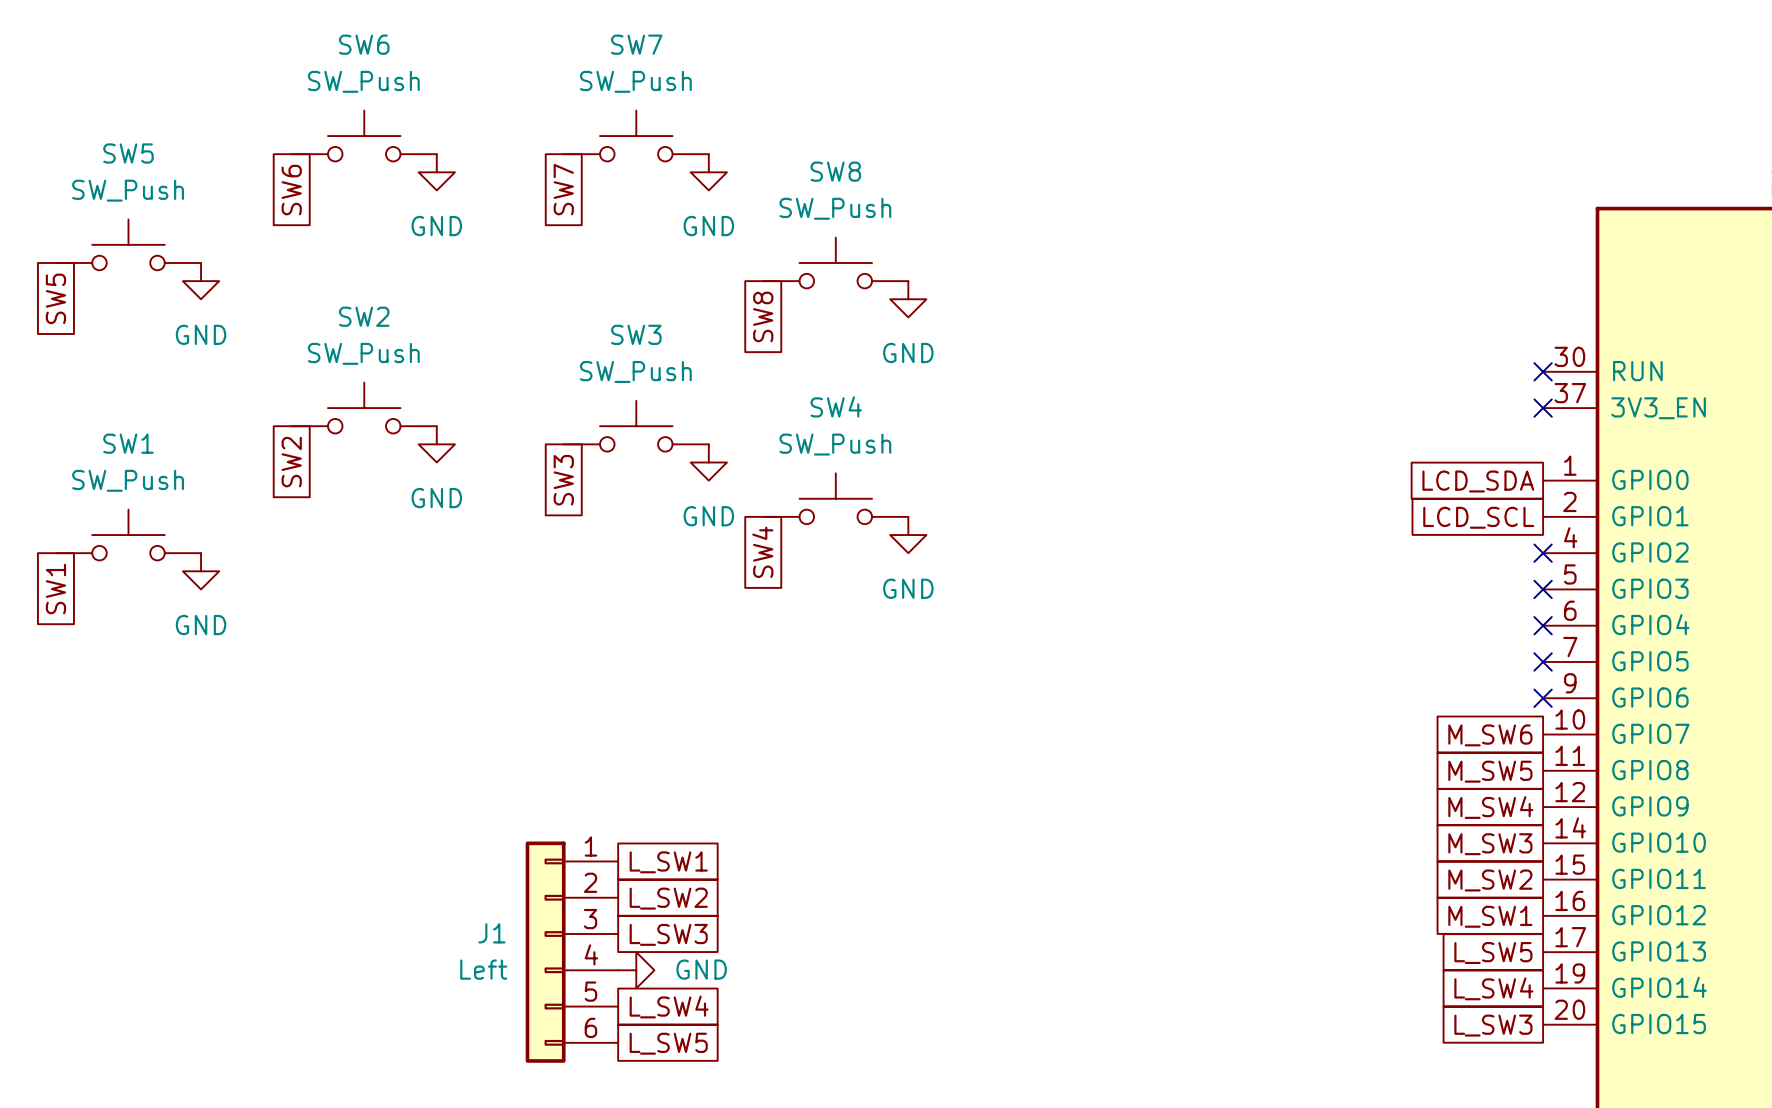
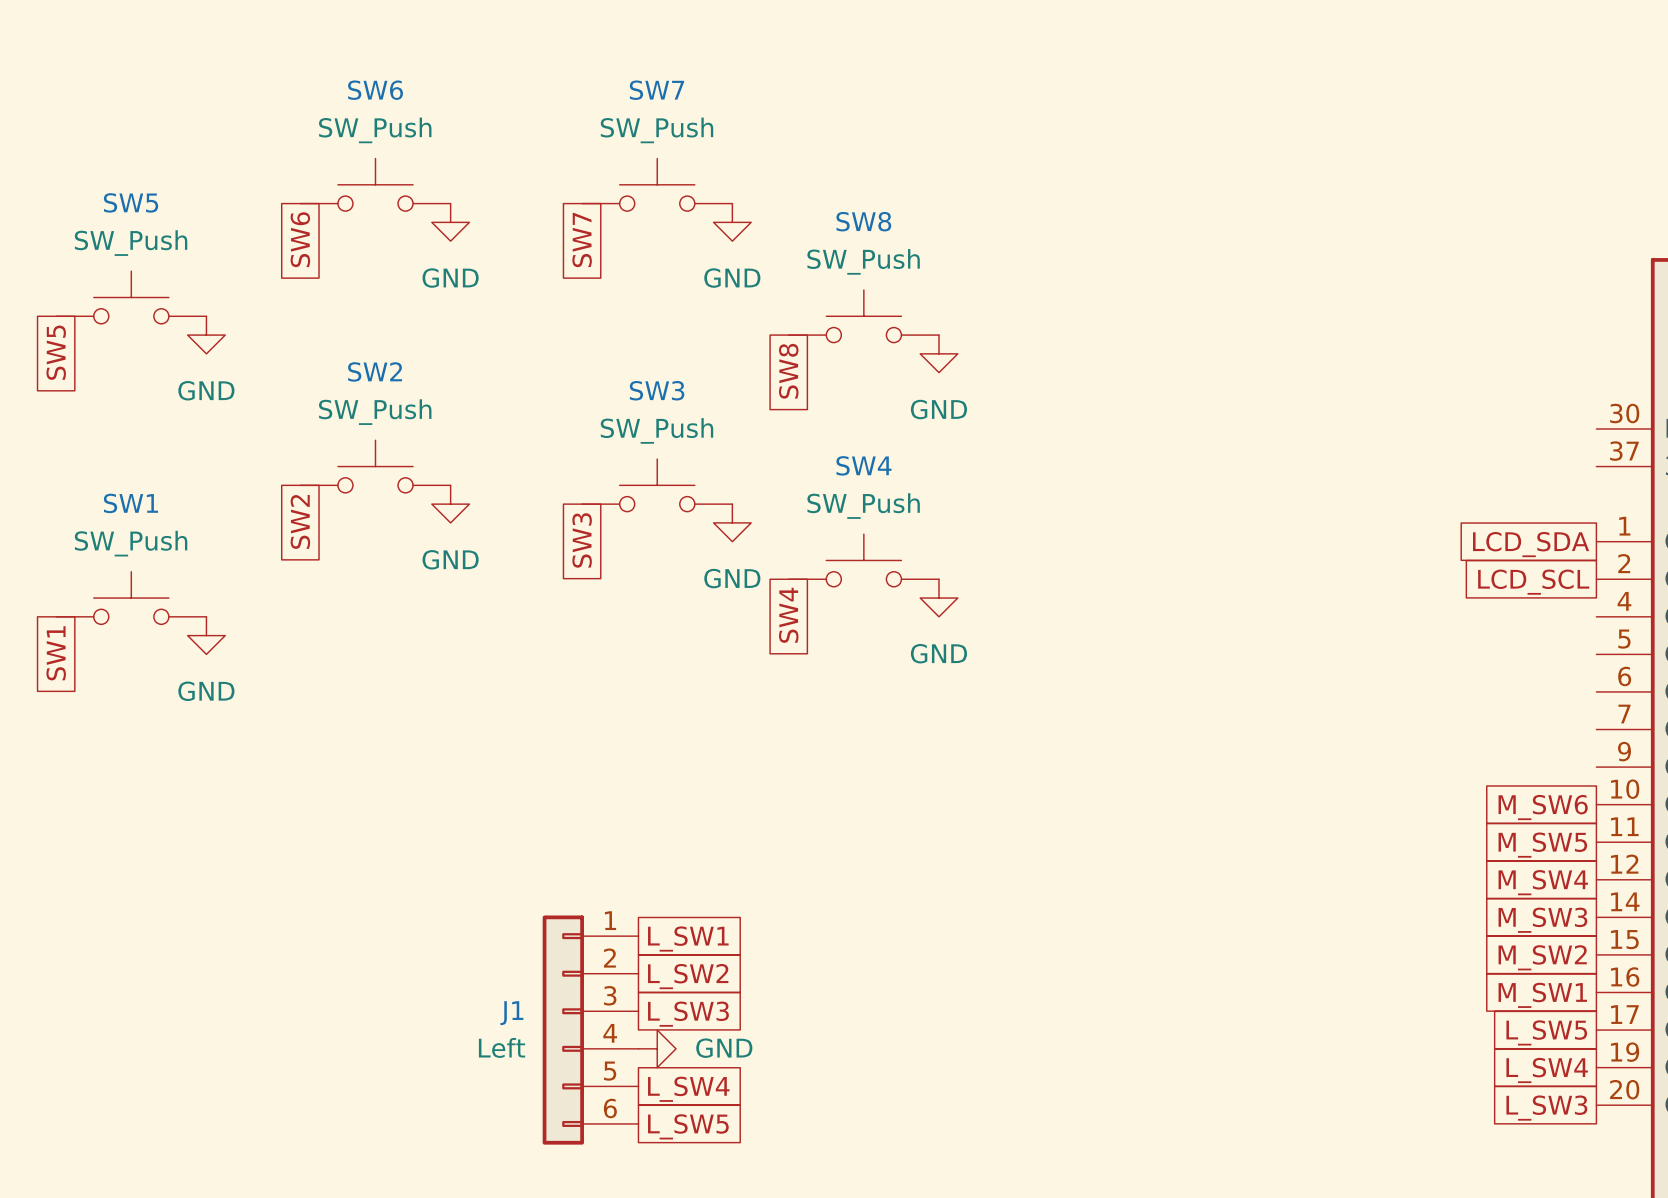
no-connect mark: (1543, 371) -> none
no-connect mark: (1543, 408) -> none
no-connect mark: (1543, 553) -> none
no-connect mark: (1543, 589) -> none
no-connect mark: (1543, 625) -> none
no-connect mark: (1543, 661) -> none
no-connect mark: (1543, 698) -> none

